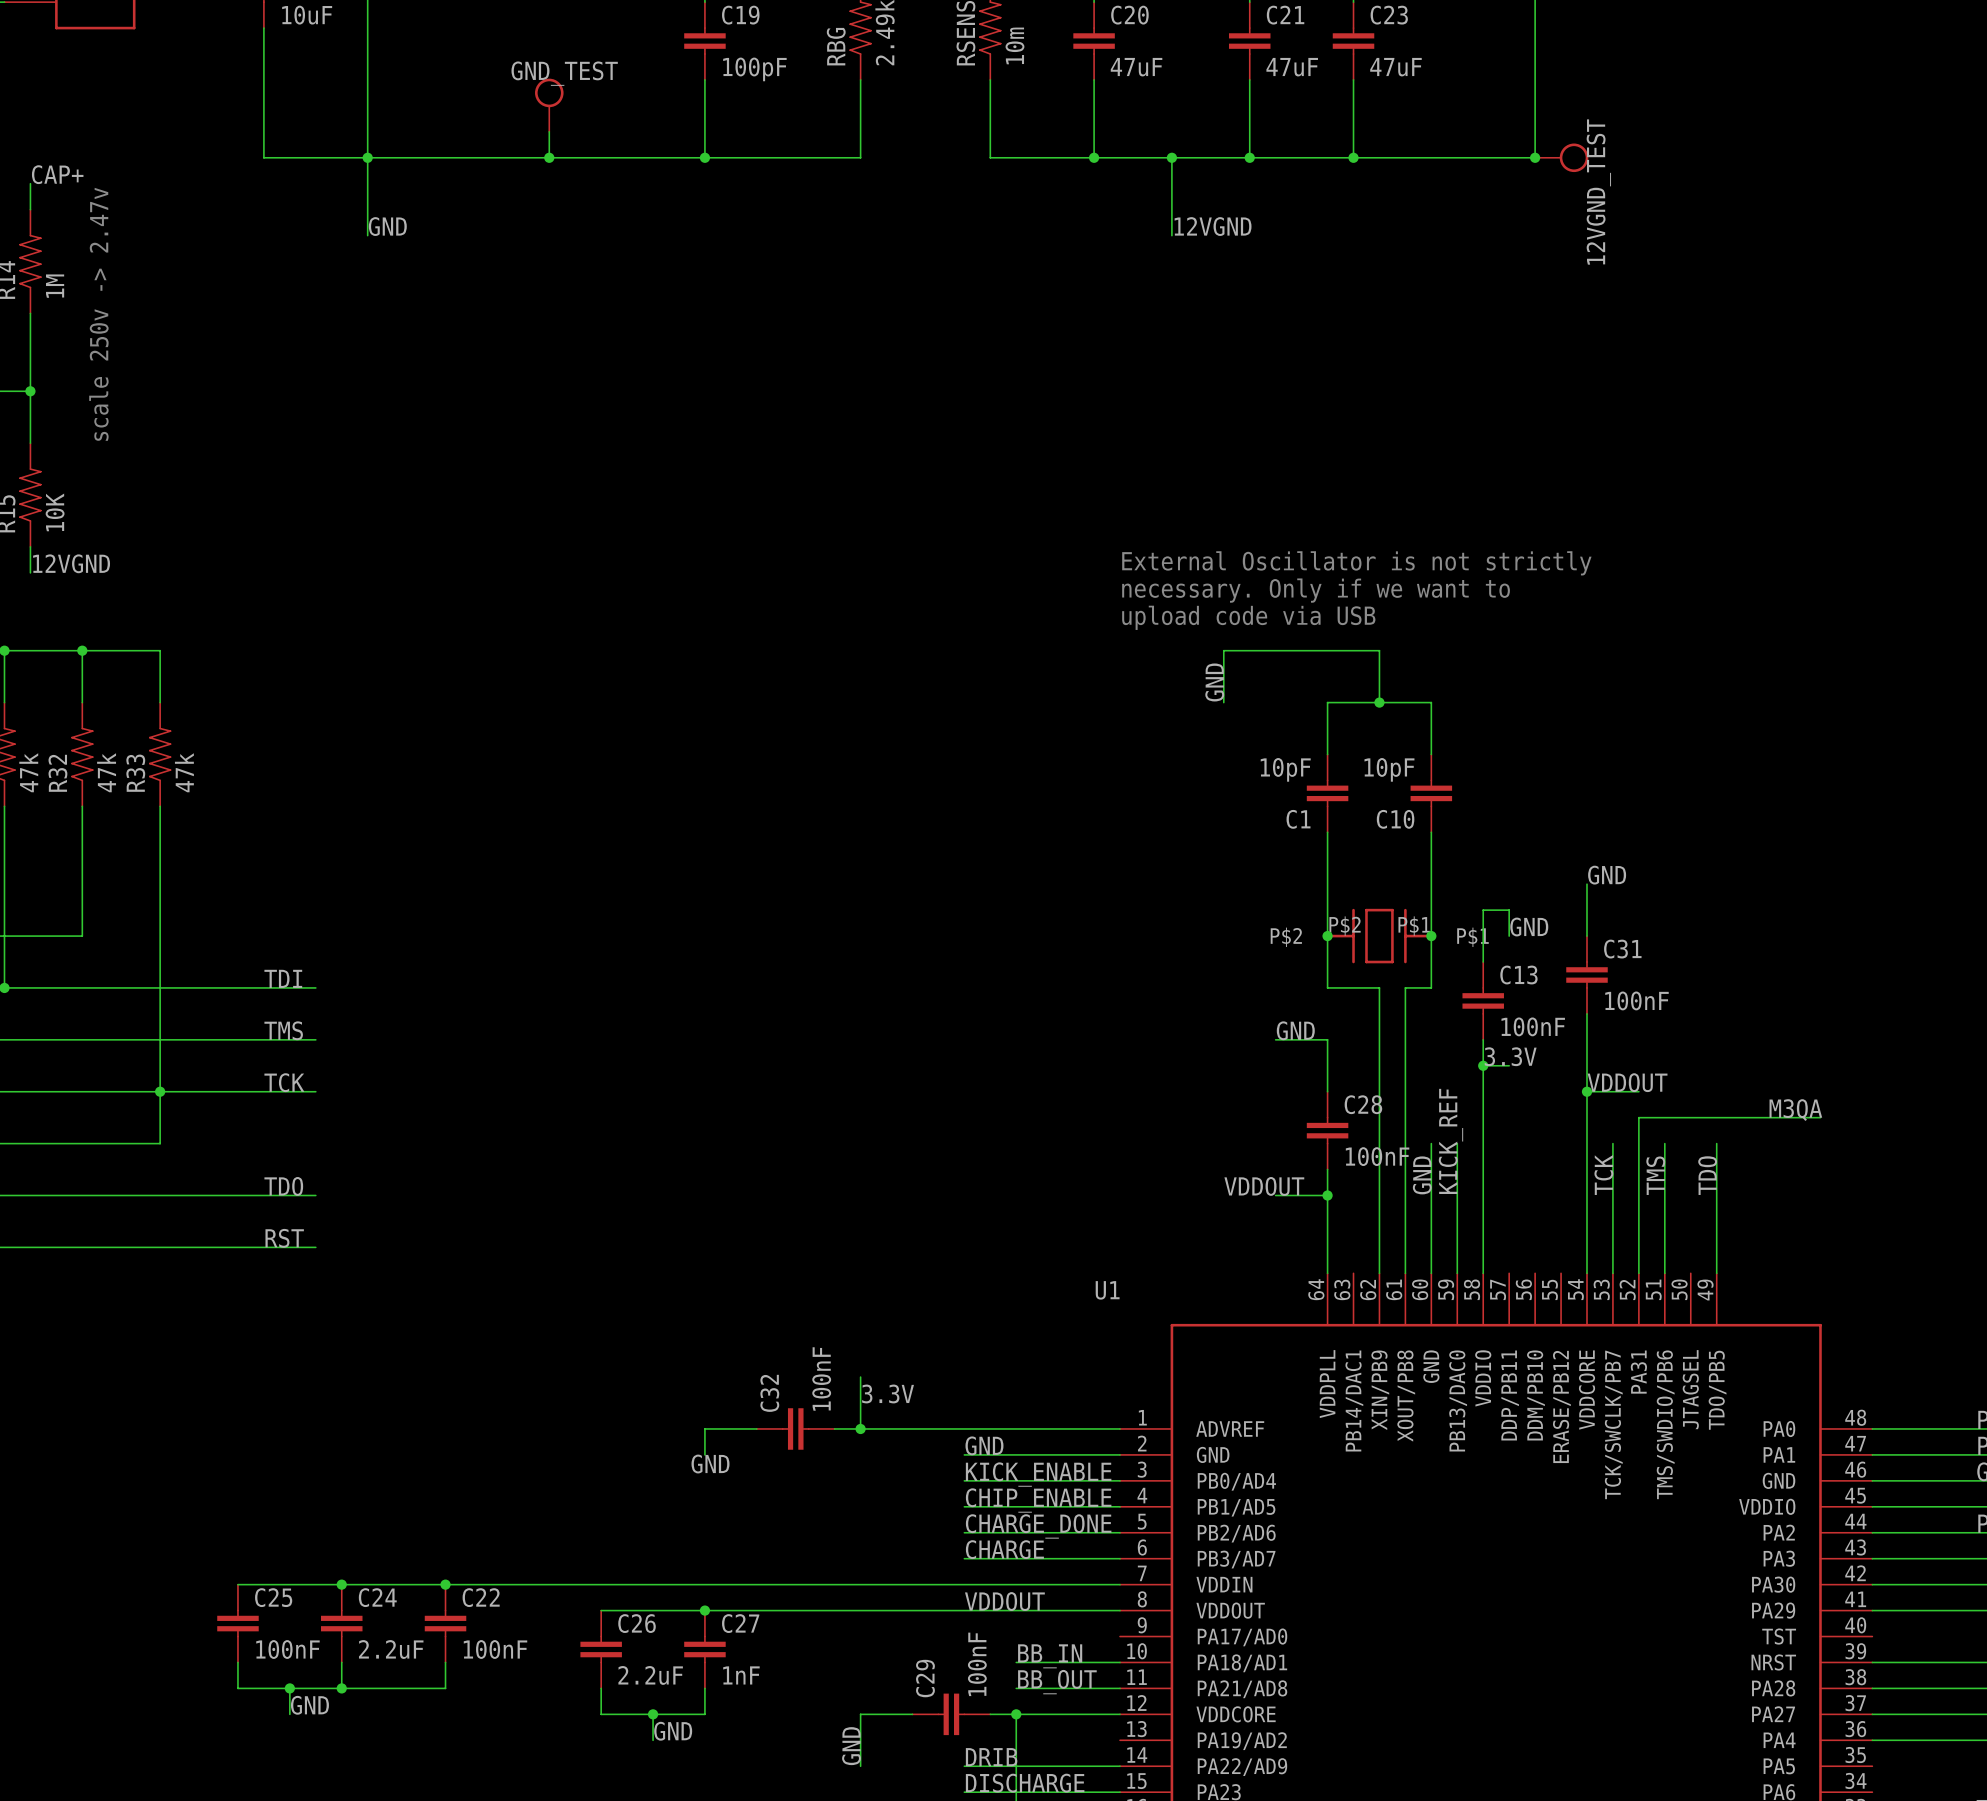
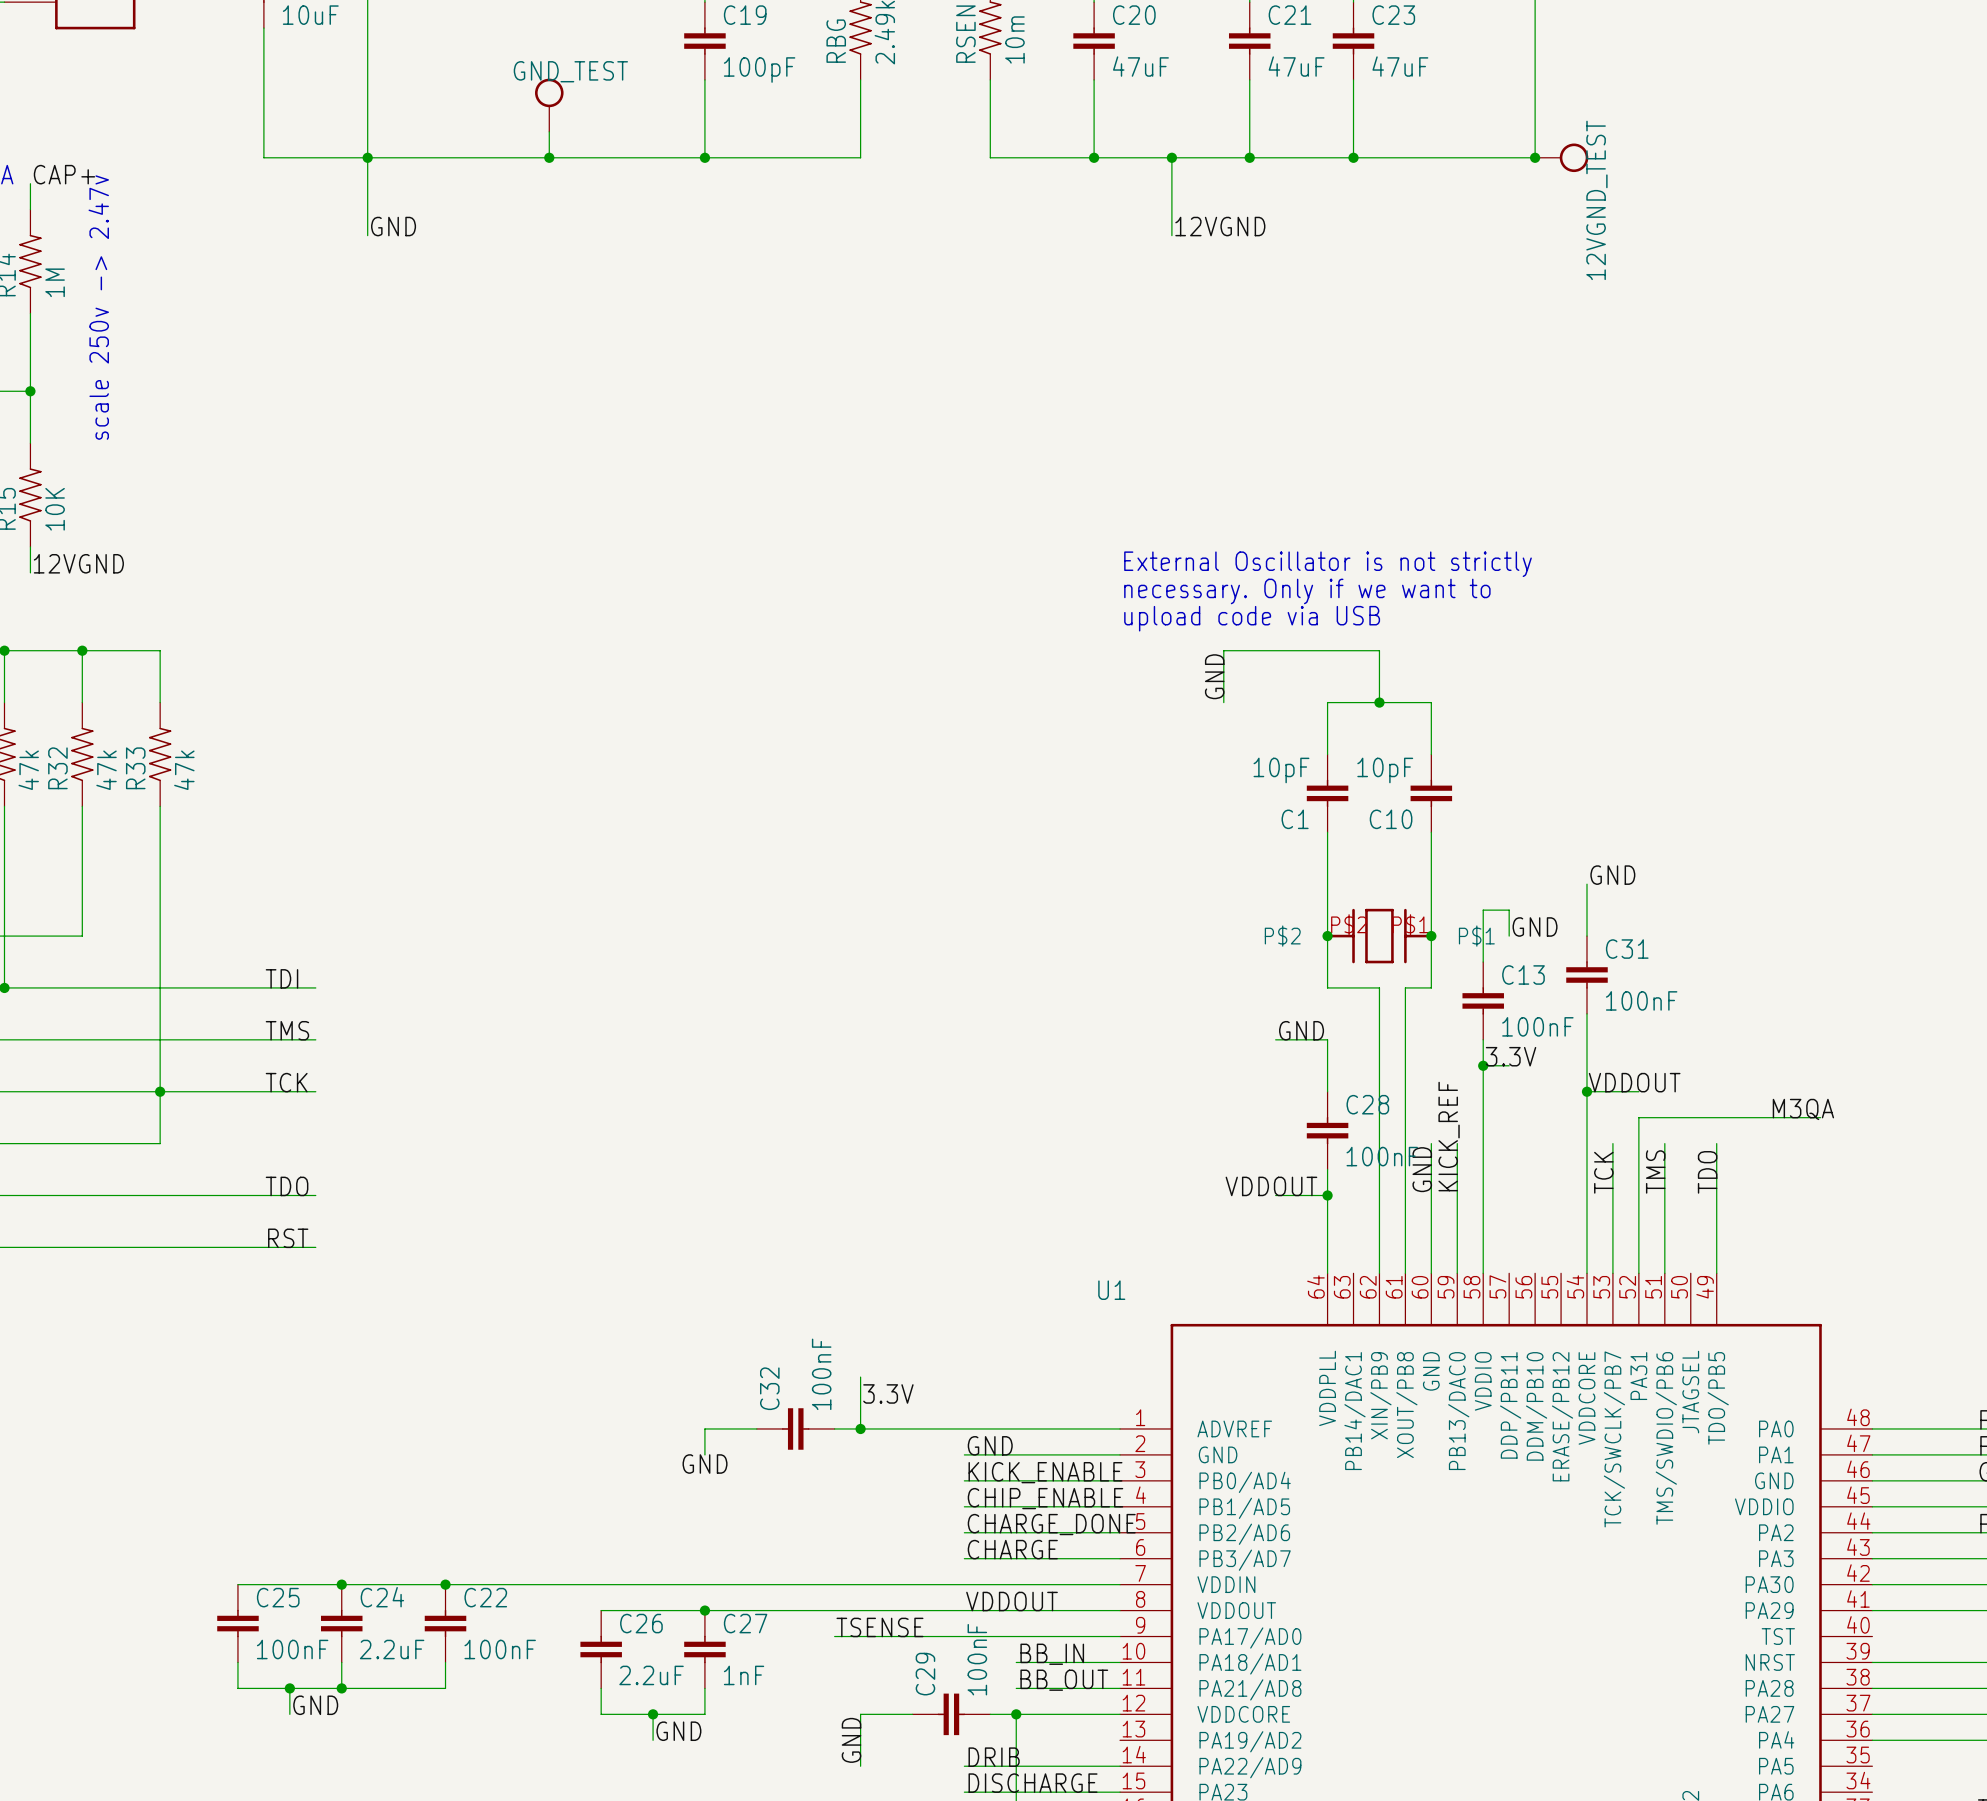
label: none -> TSENSE (879, 1627)
wire: none -> (834, 1636) (1120, 1636)

